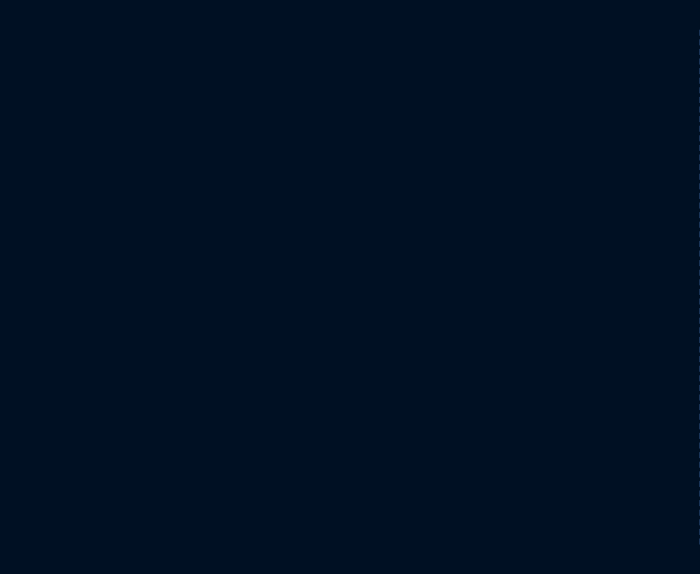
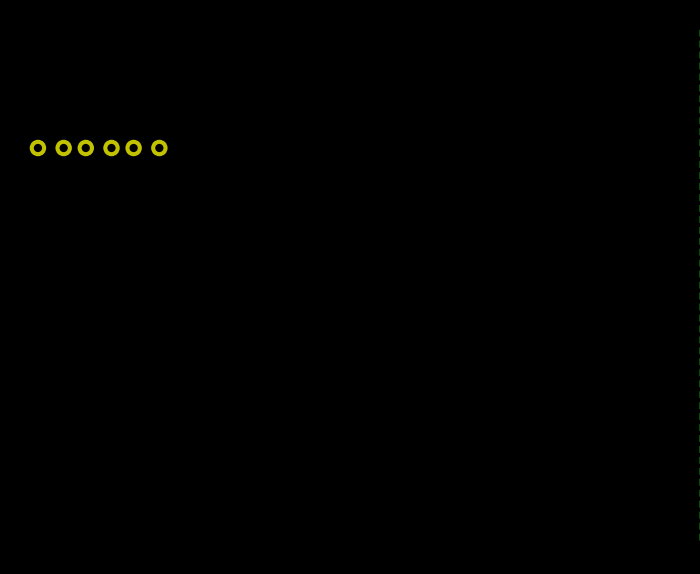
part: none -> (50, 147)
part: none -> (98, 147)
part: none -> (146, 147)

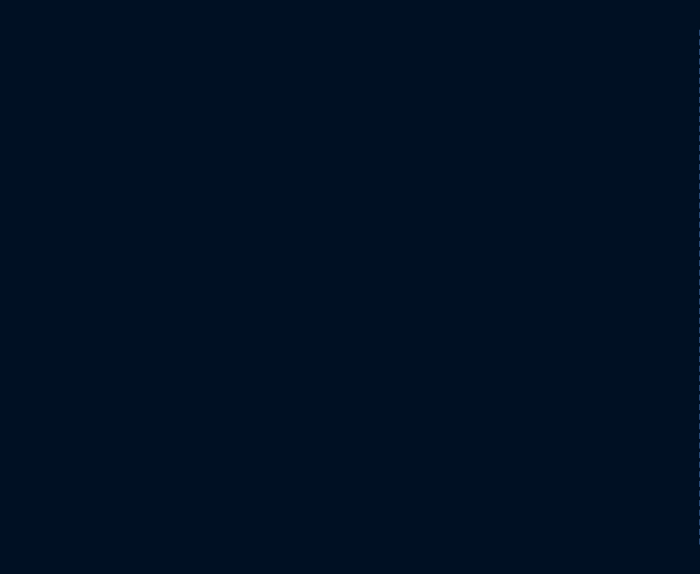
part: (50, 147) -> none
part: (98, 147) -> none
part: (146, 147) -> none

